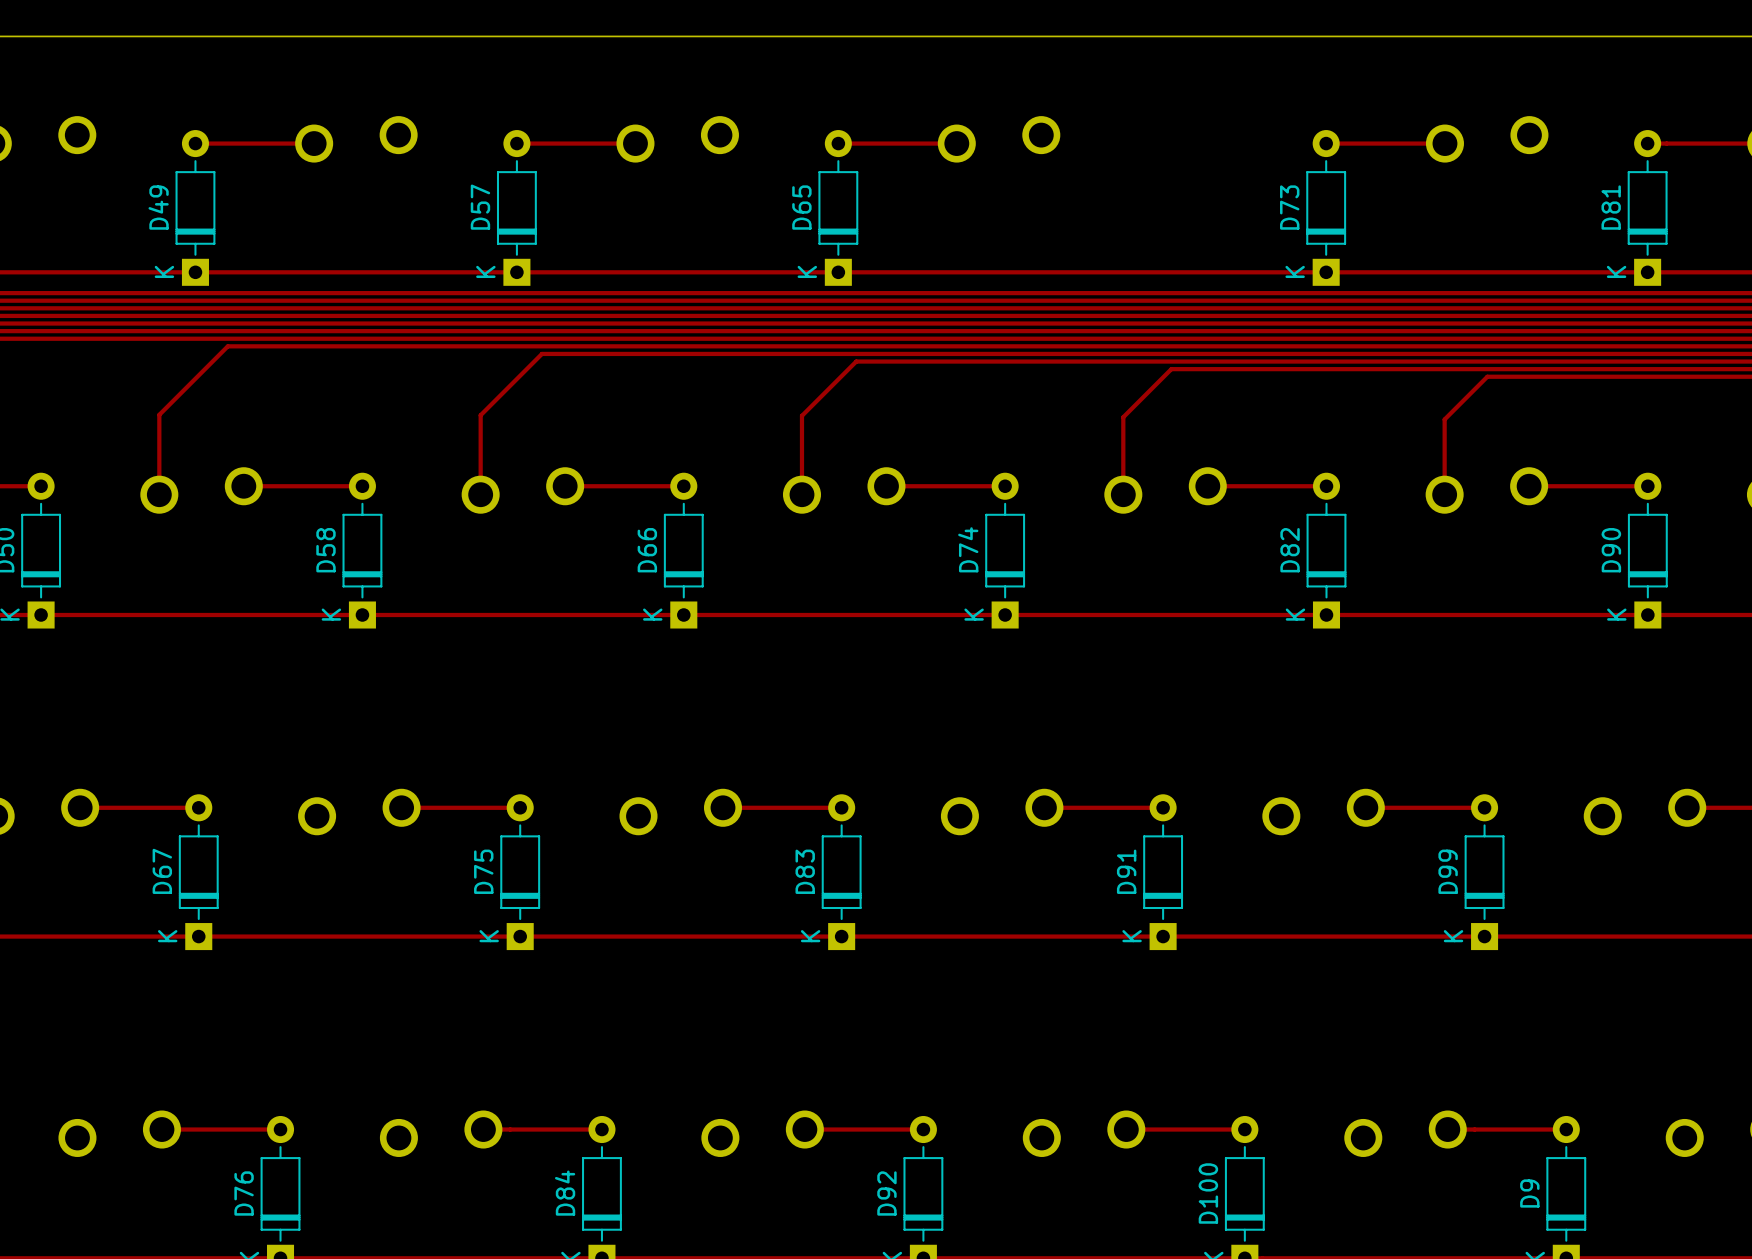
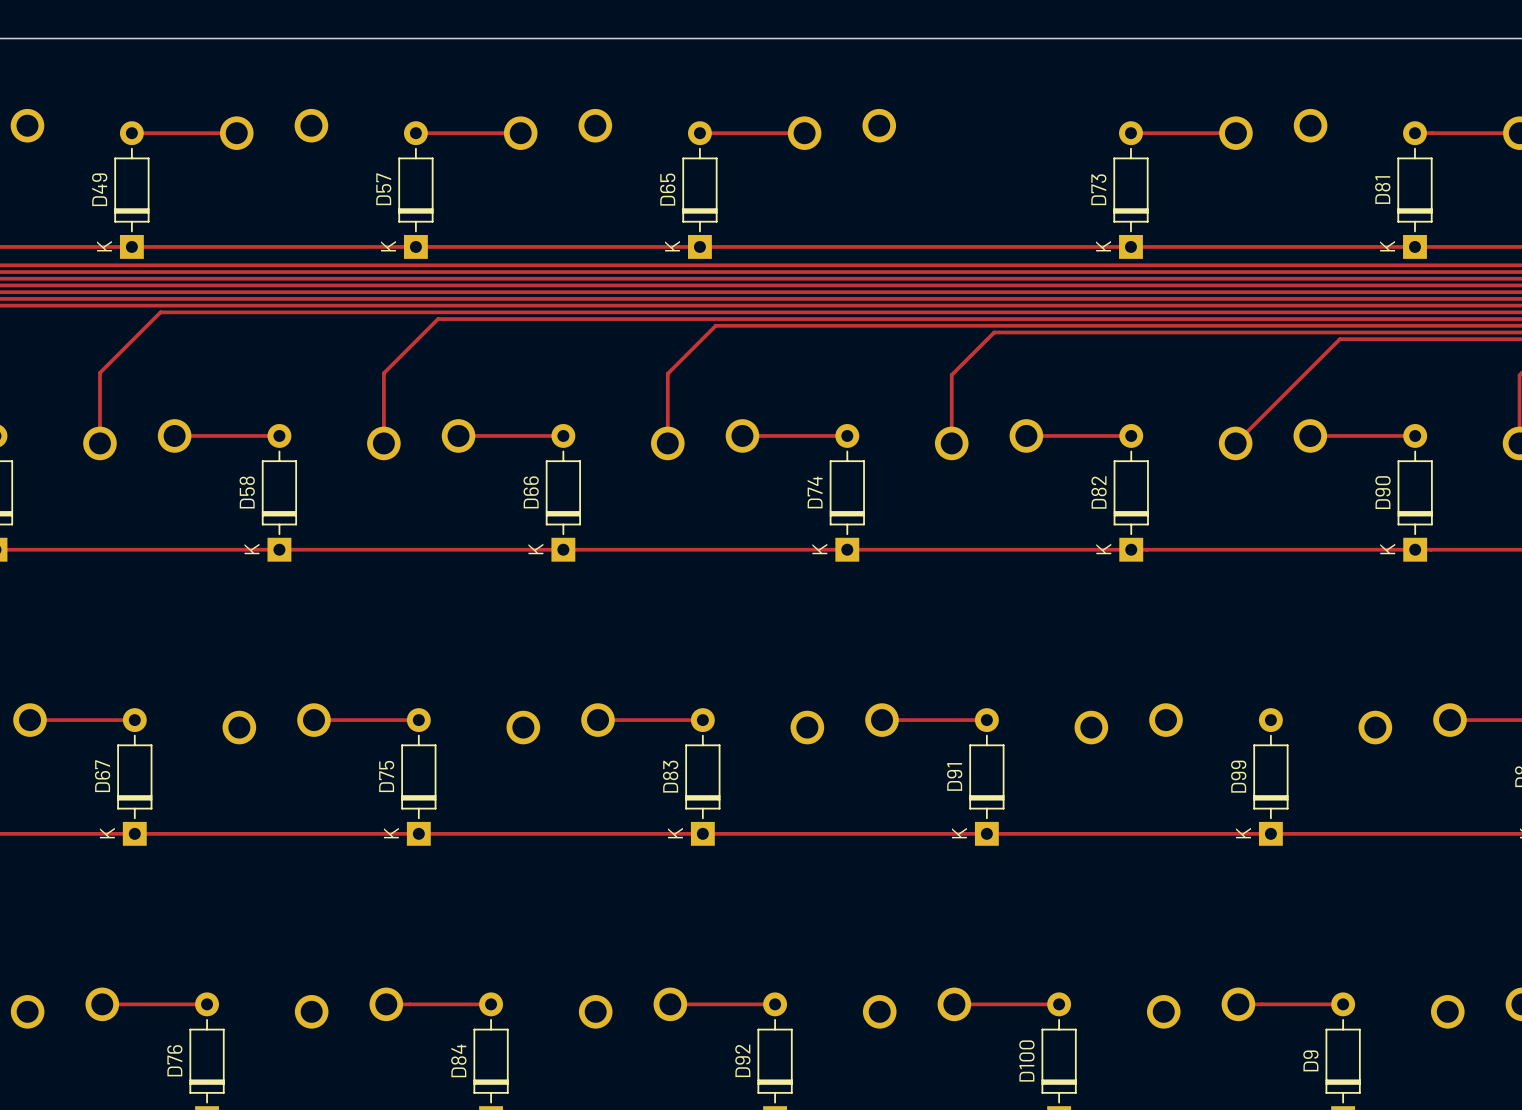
track: (1562, 376) (1487, 376) (1444, 419) (1444, 494) -> (1339, 339) (1235, 443)
track: (1365, 807) (1484, 807) -> none

